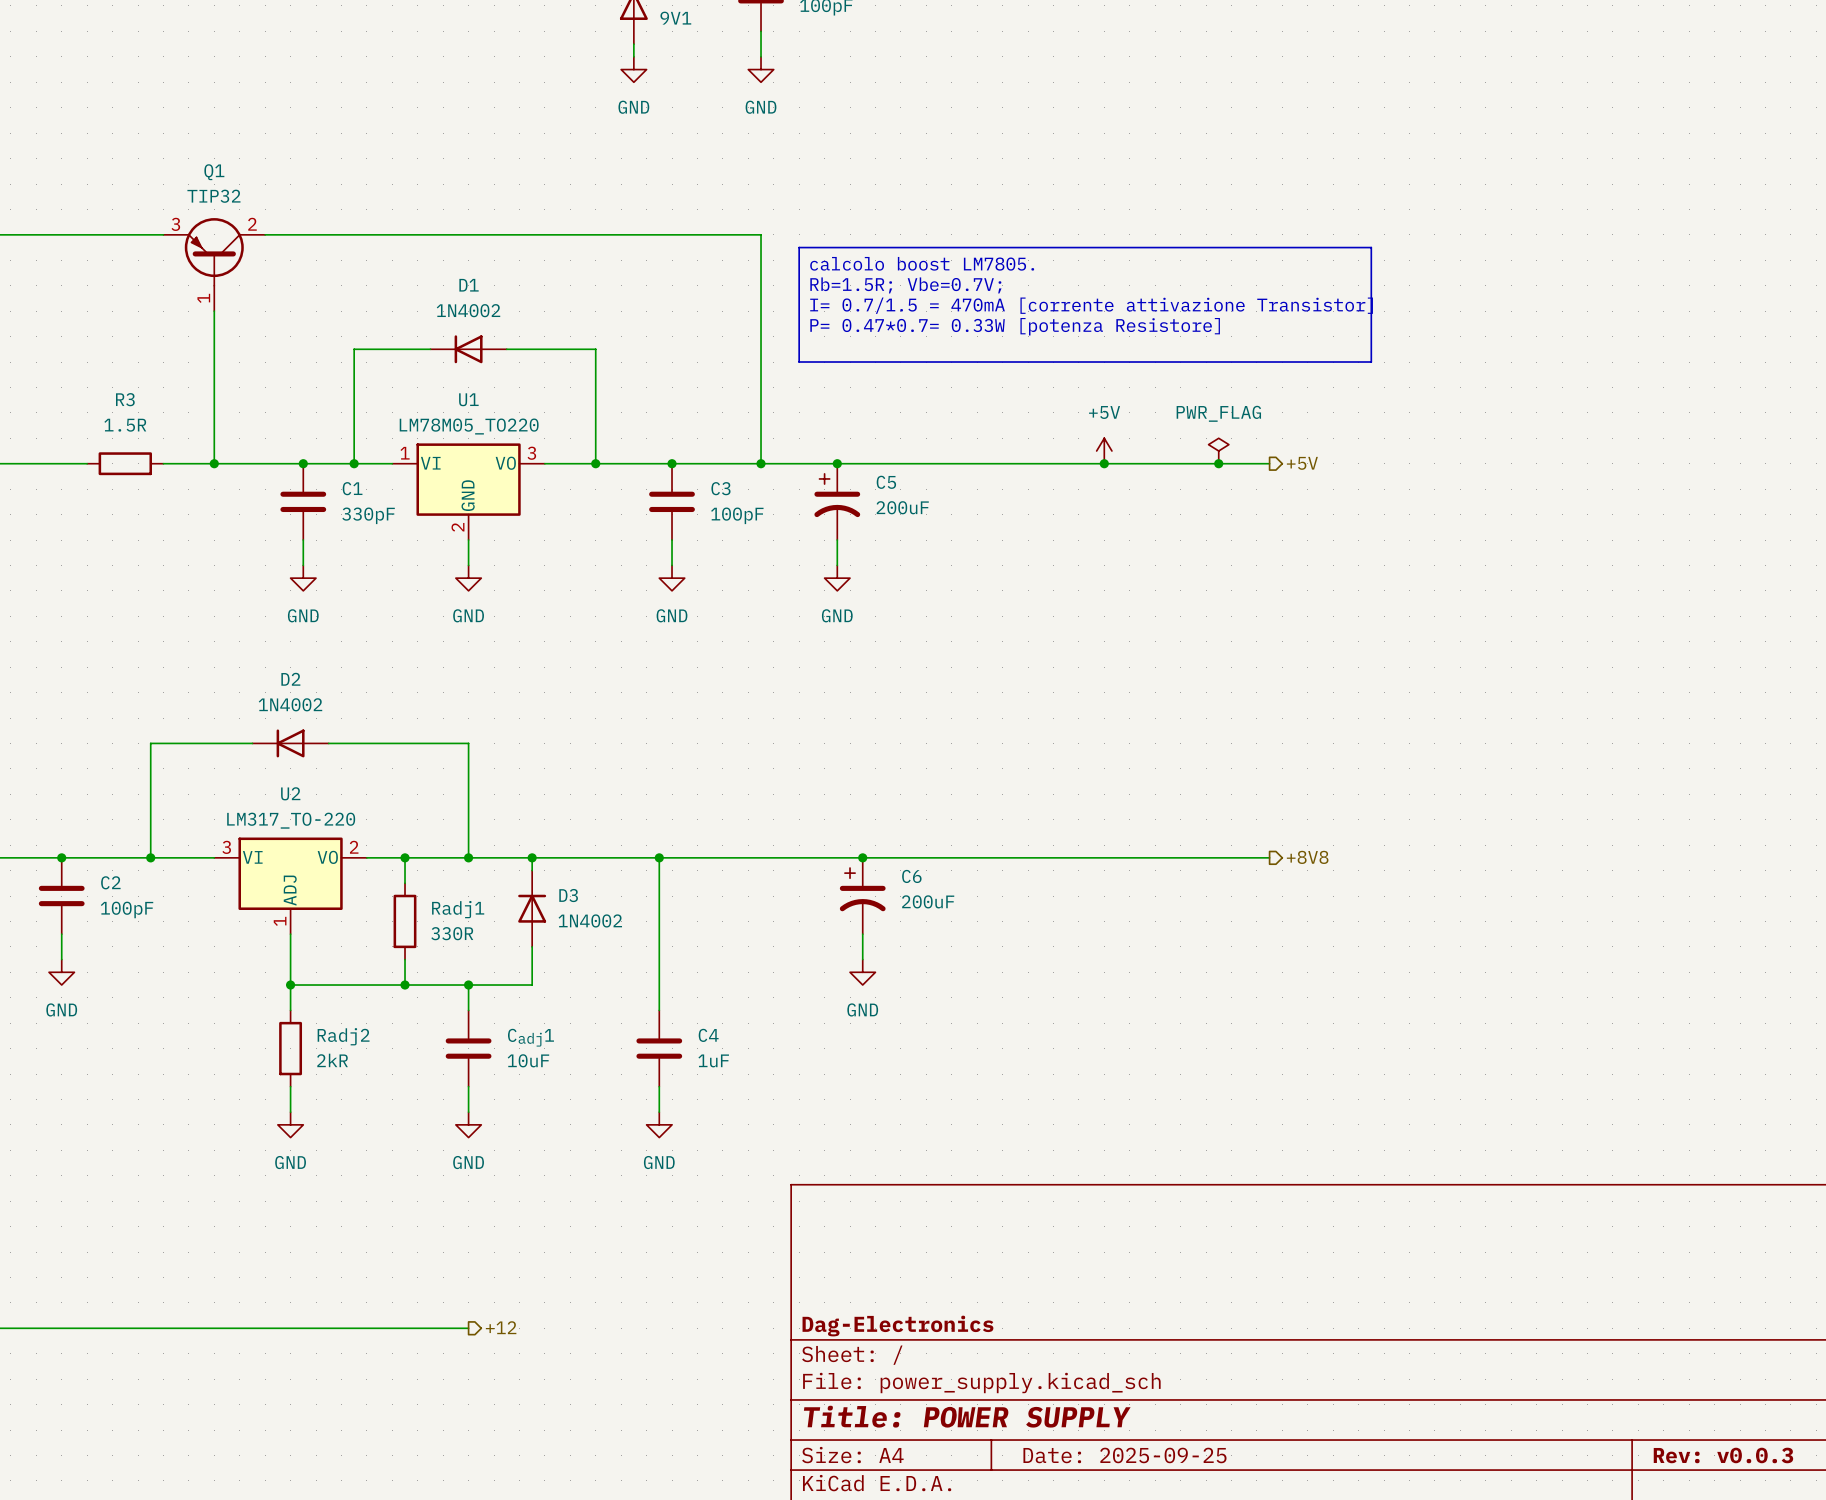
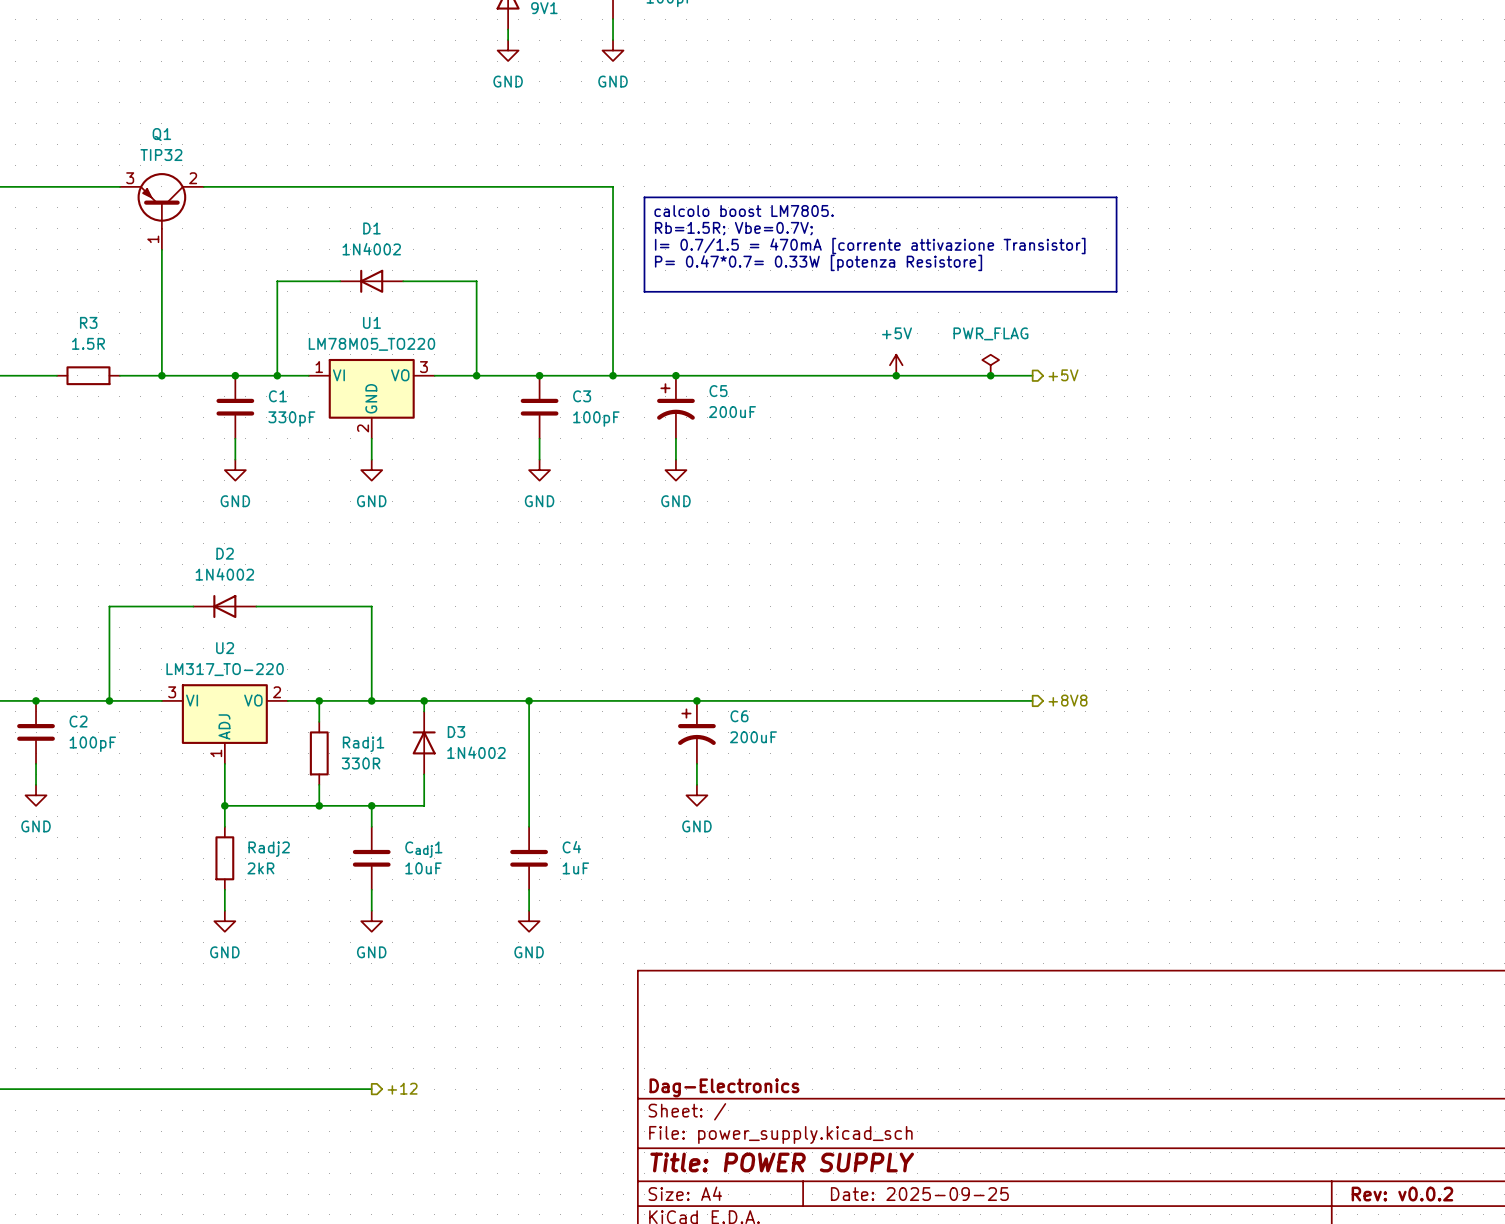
title block: Rev: v0.0.3 (1723, 1455) -> Rev: v0.0.2 (1402, 1194)

